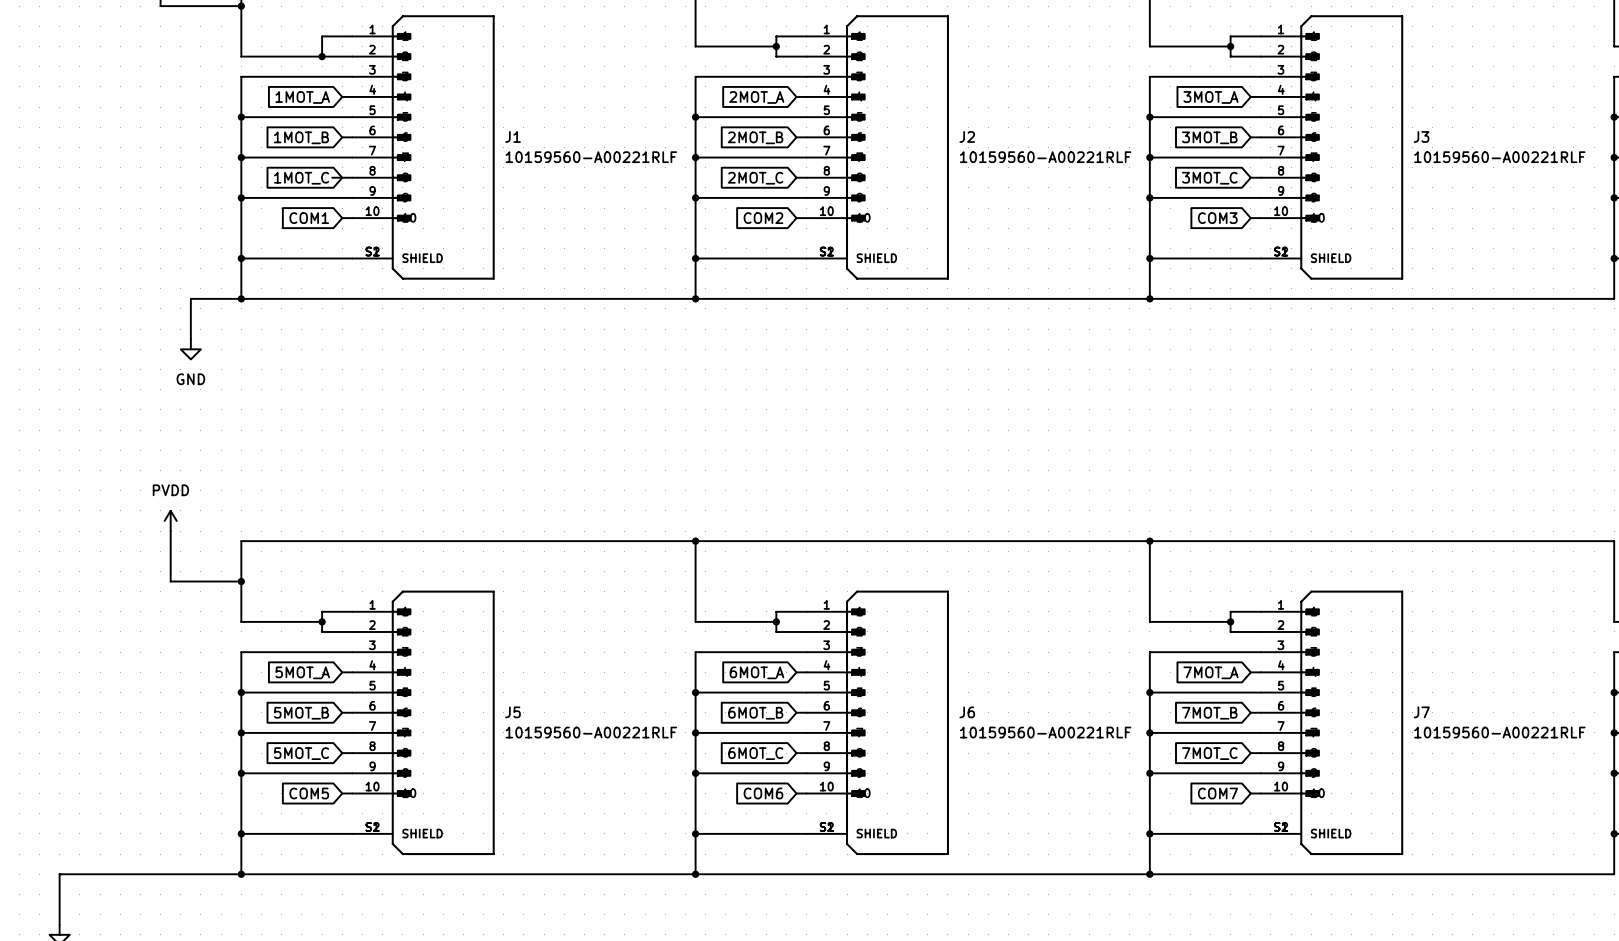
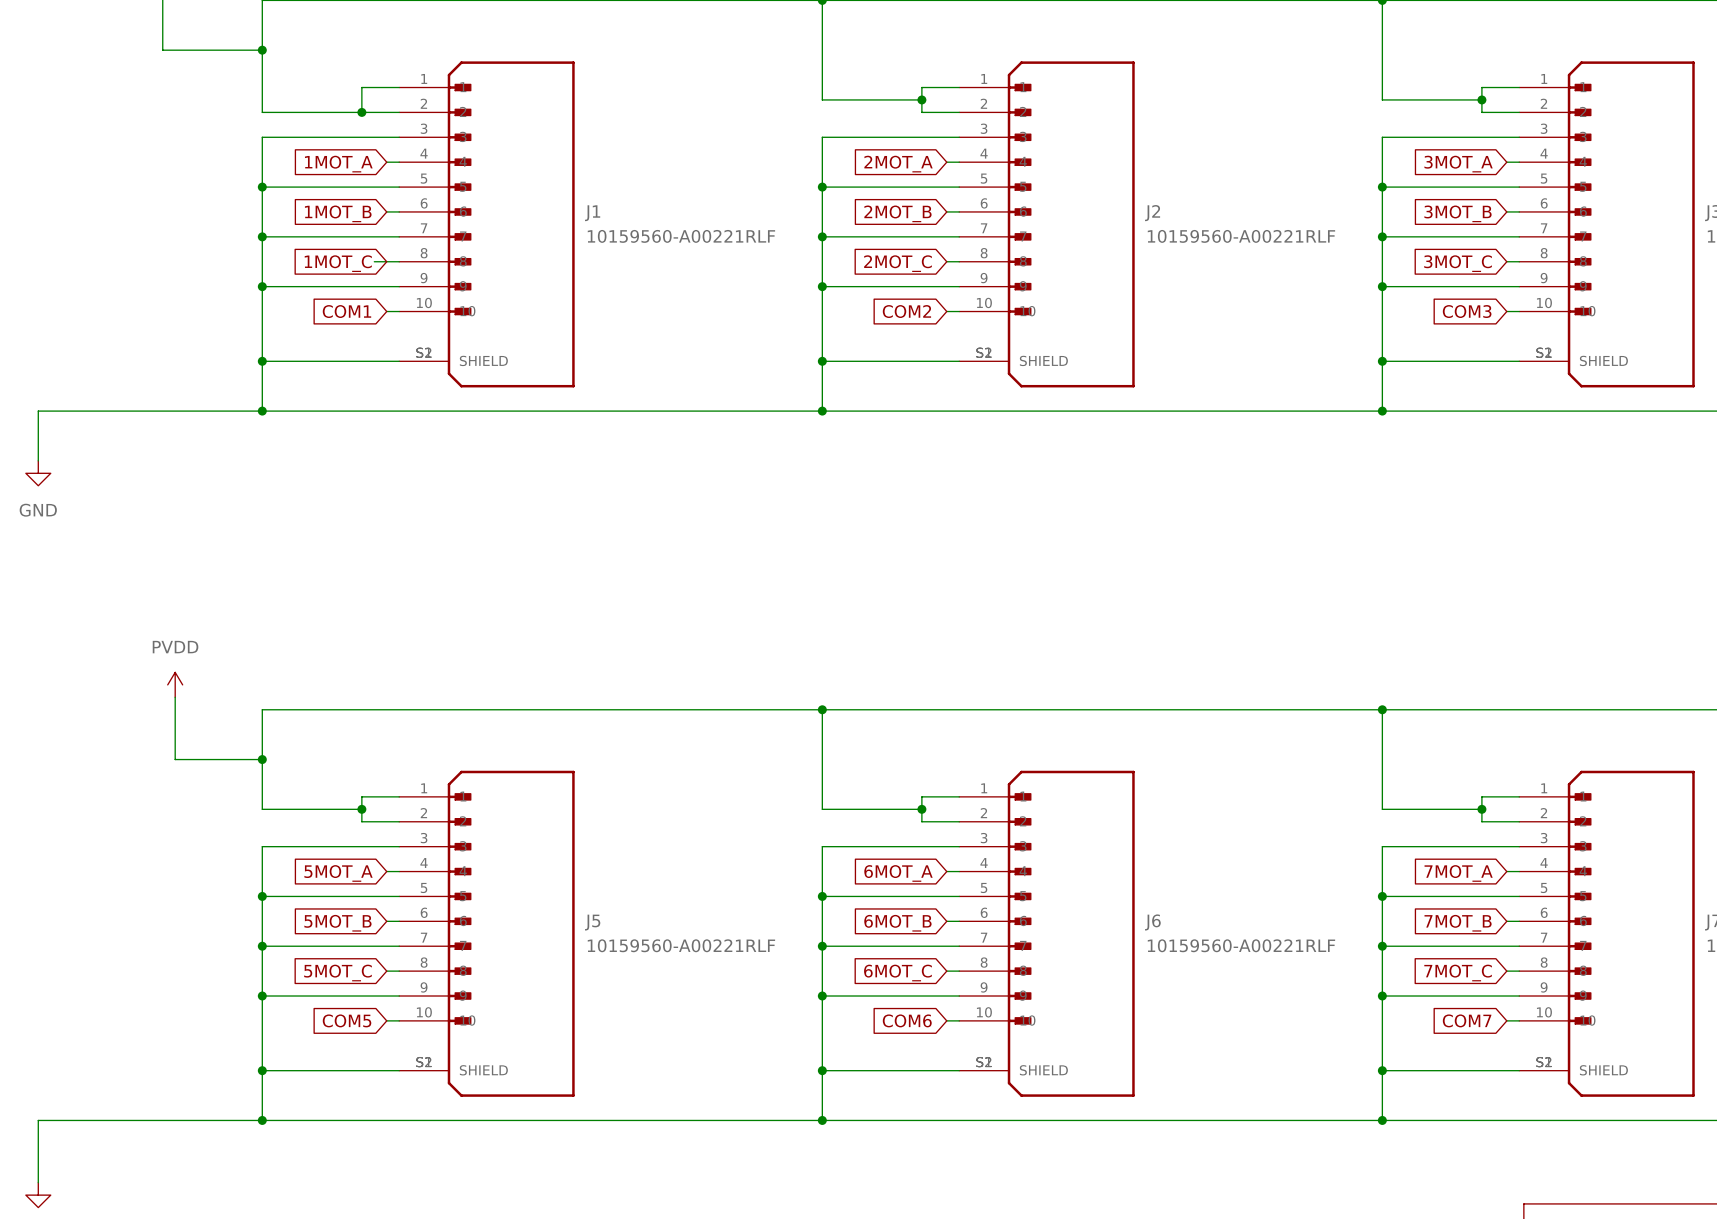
wire: (190, 298) (190, 339) -> (200, 411) (38, 411) (38, 460)
power symbol position: GND (190, 349) -> GND (38, 473)

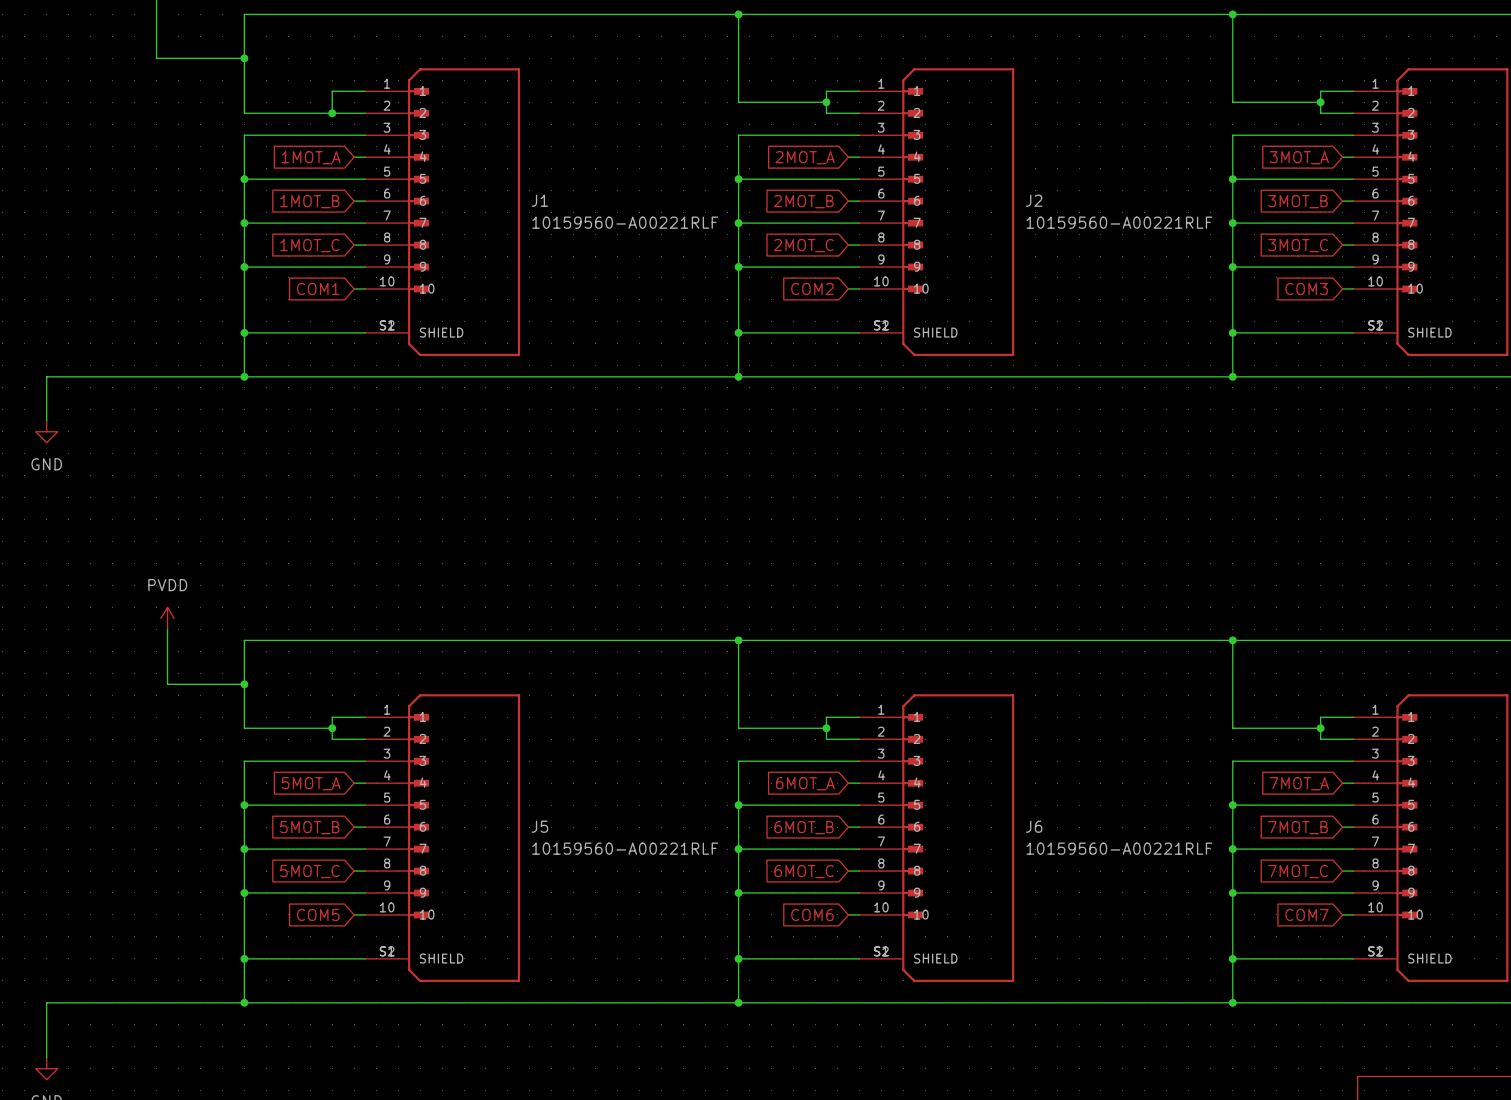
wire: (374, 261) (386, 261) -> none

